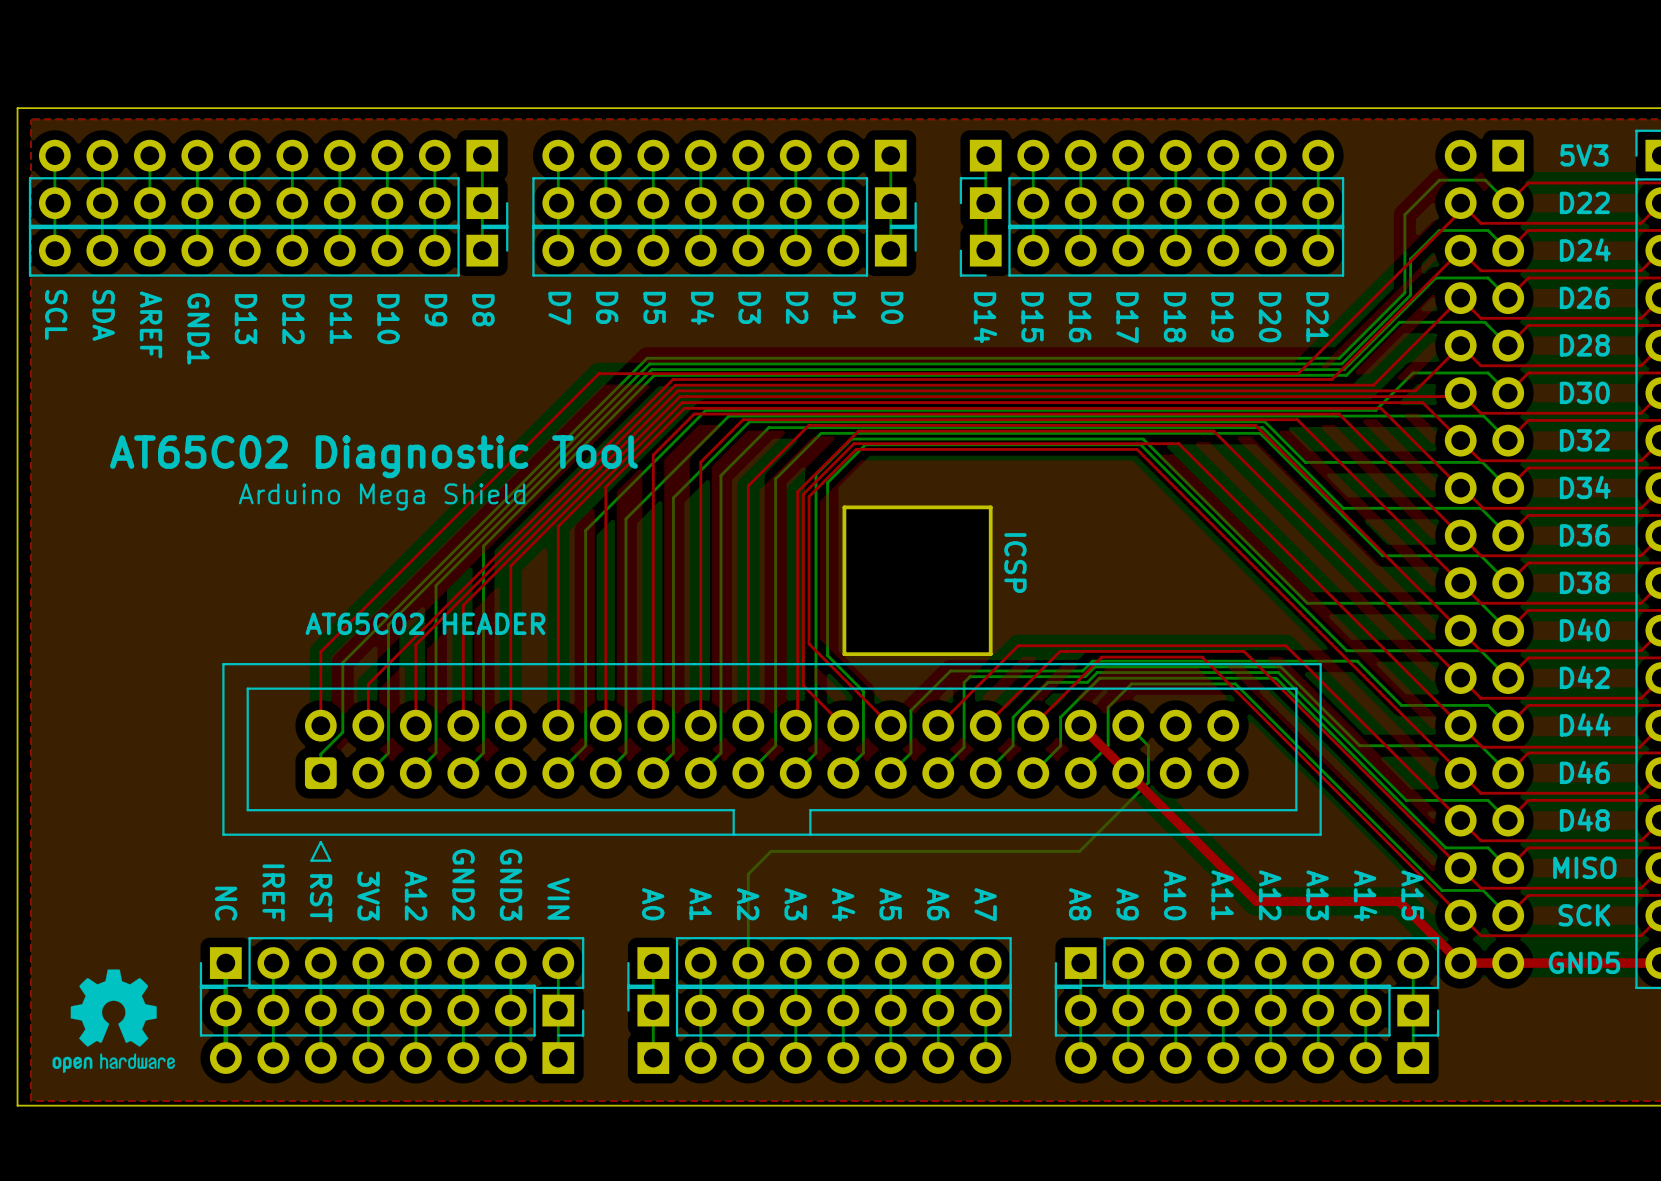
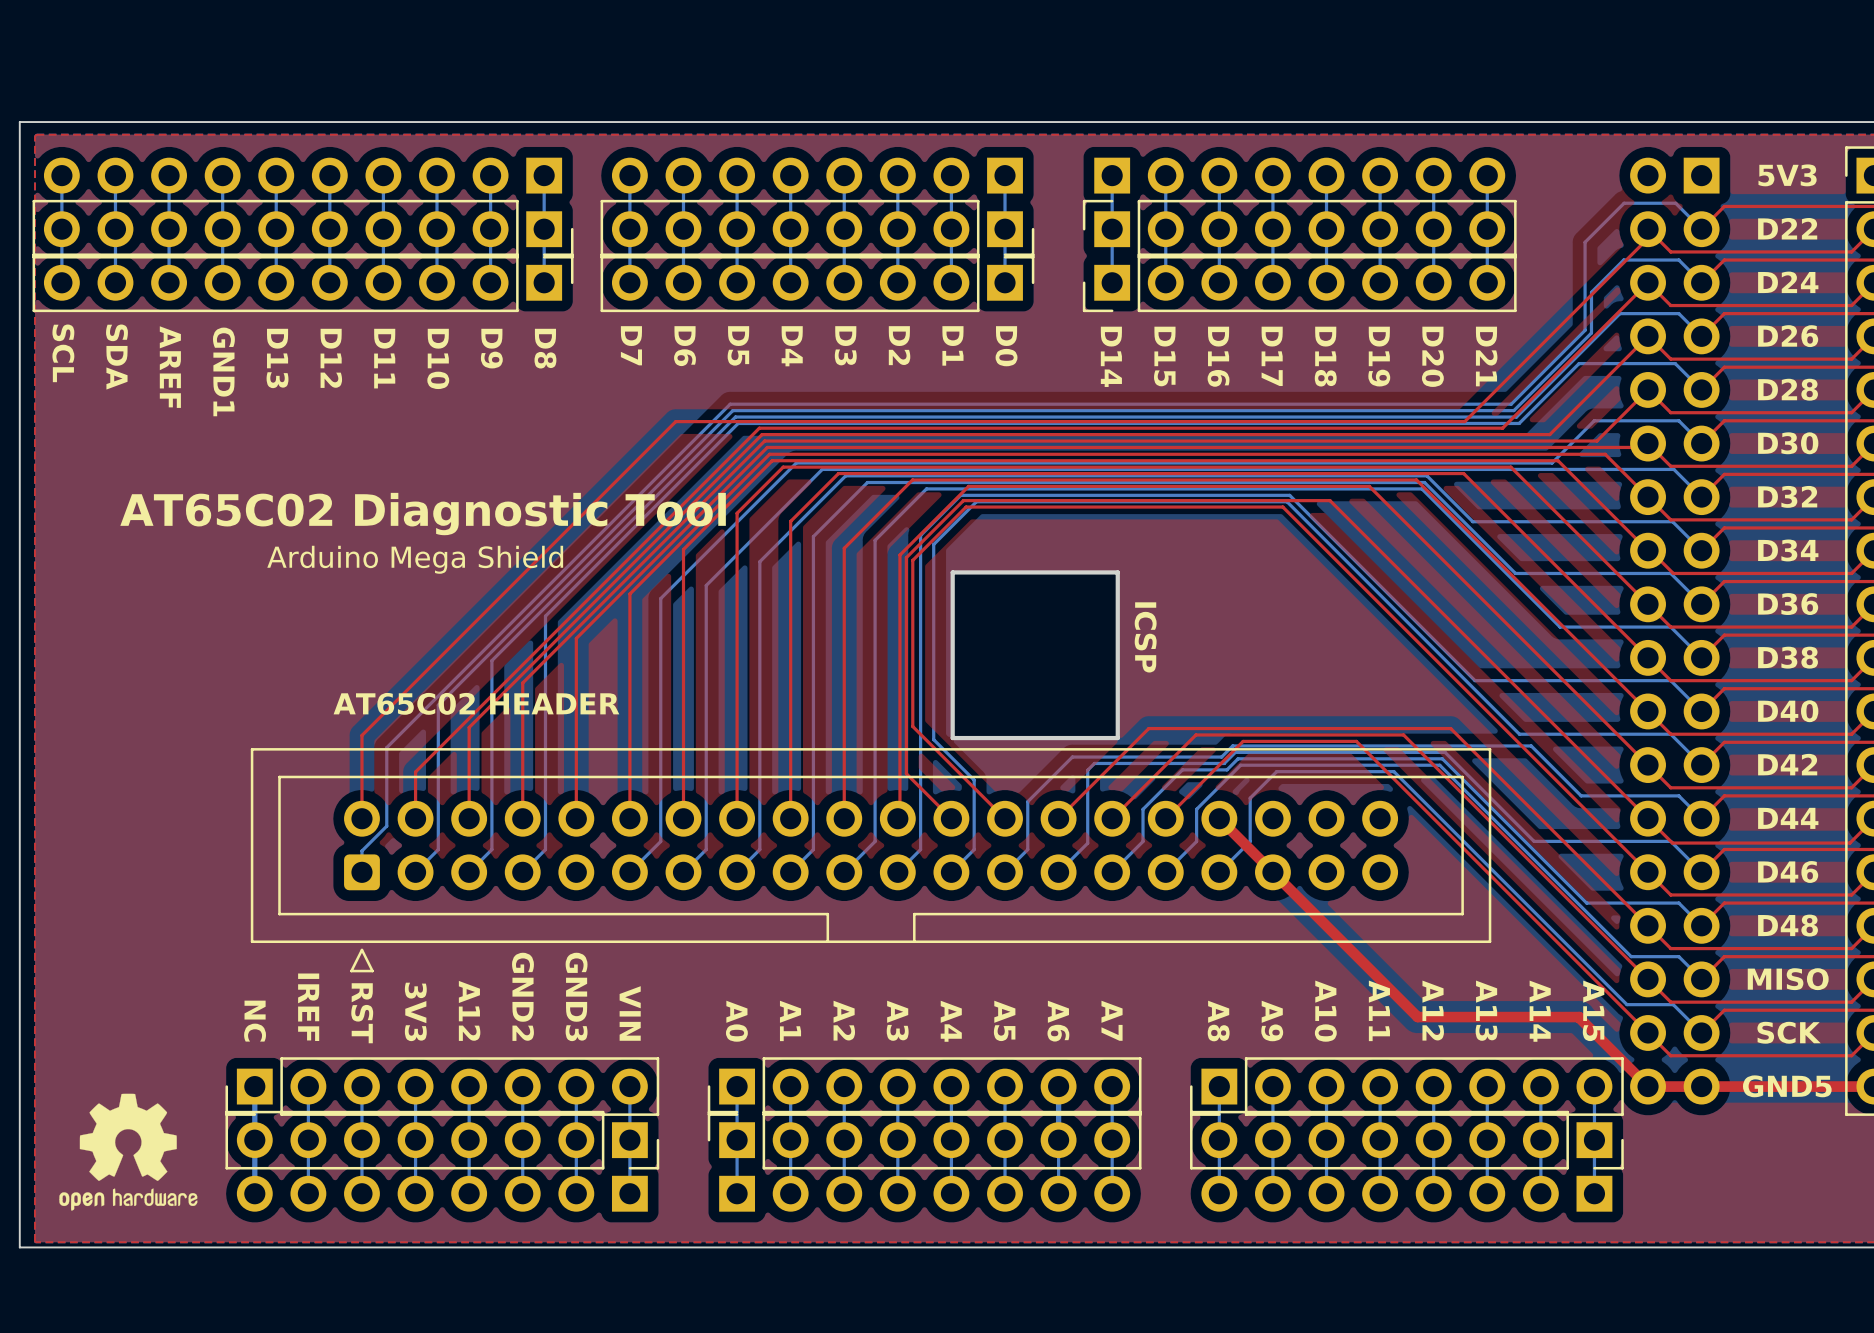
bottom track: (1128, 725) (1148, 745) (1148, 782) (1079, 851) (771, 851) (748, 874) (748, 963) -> none

